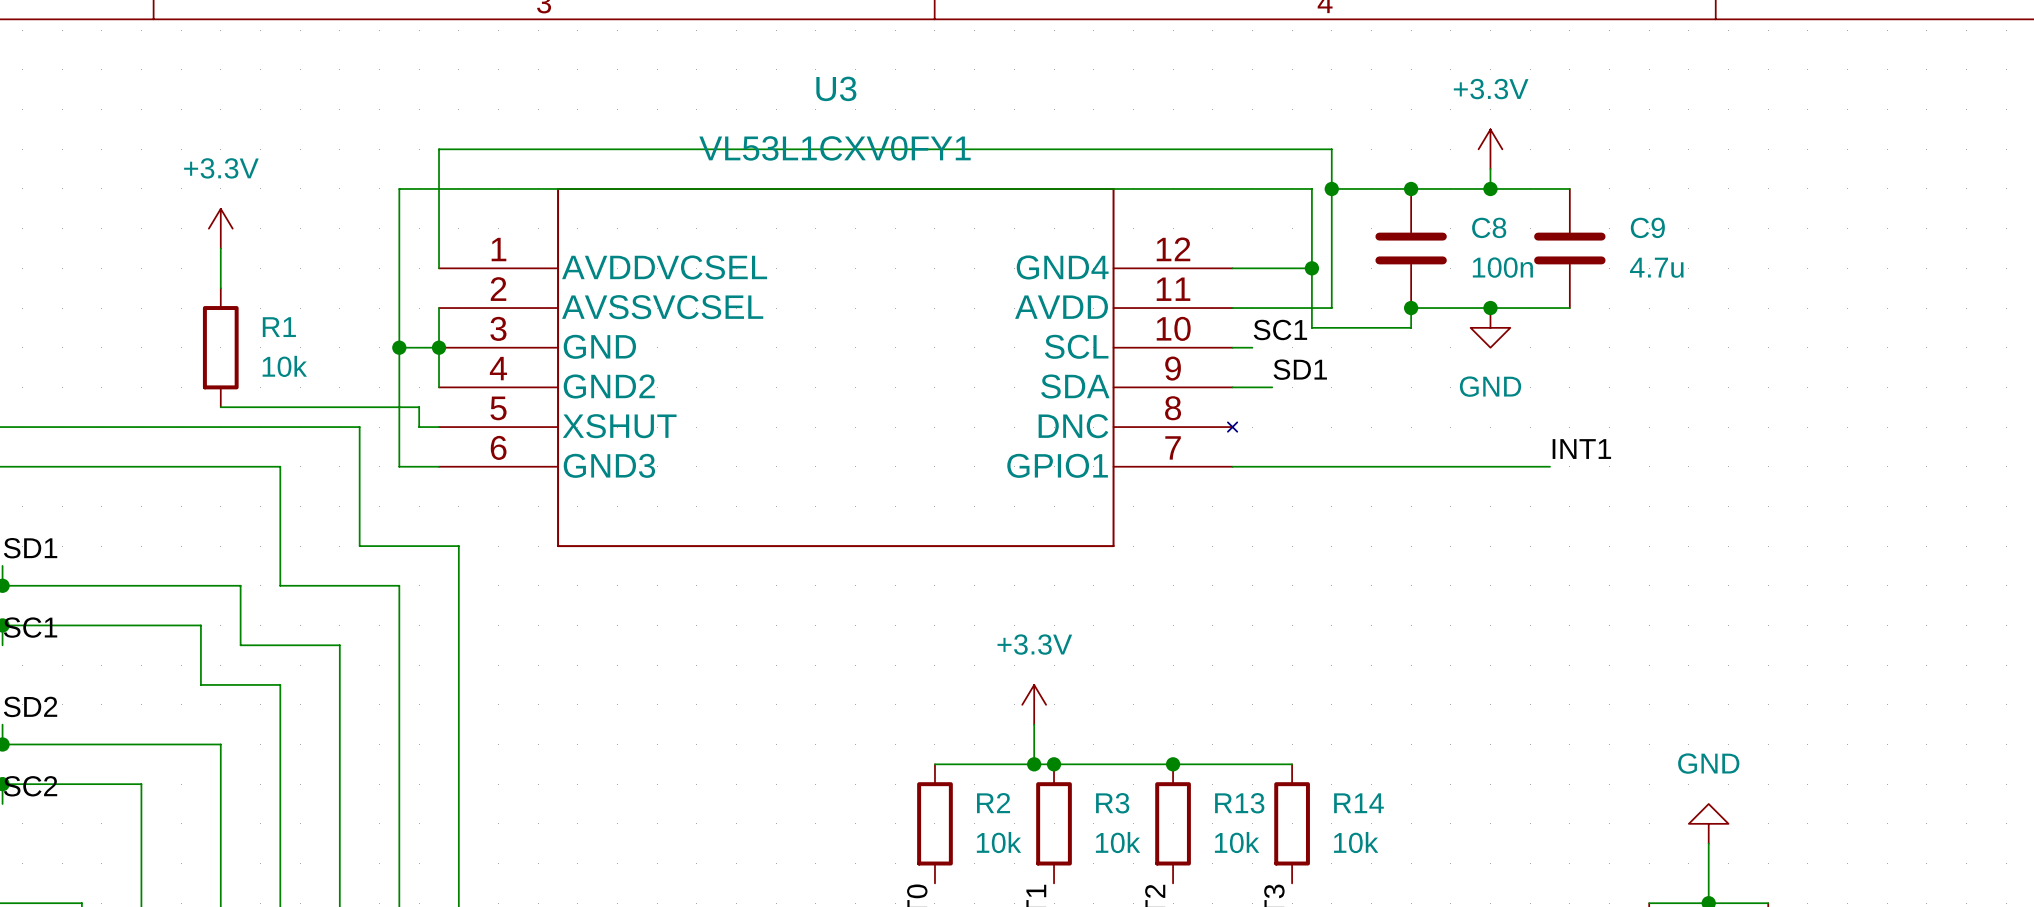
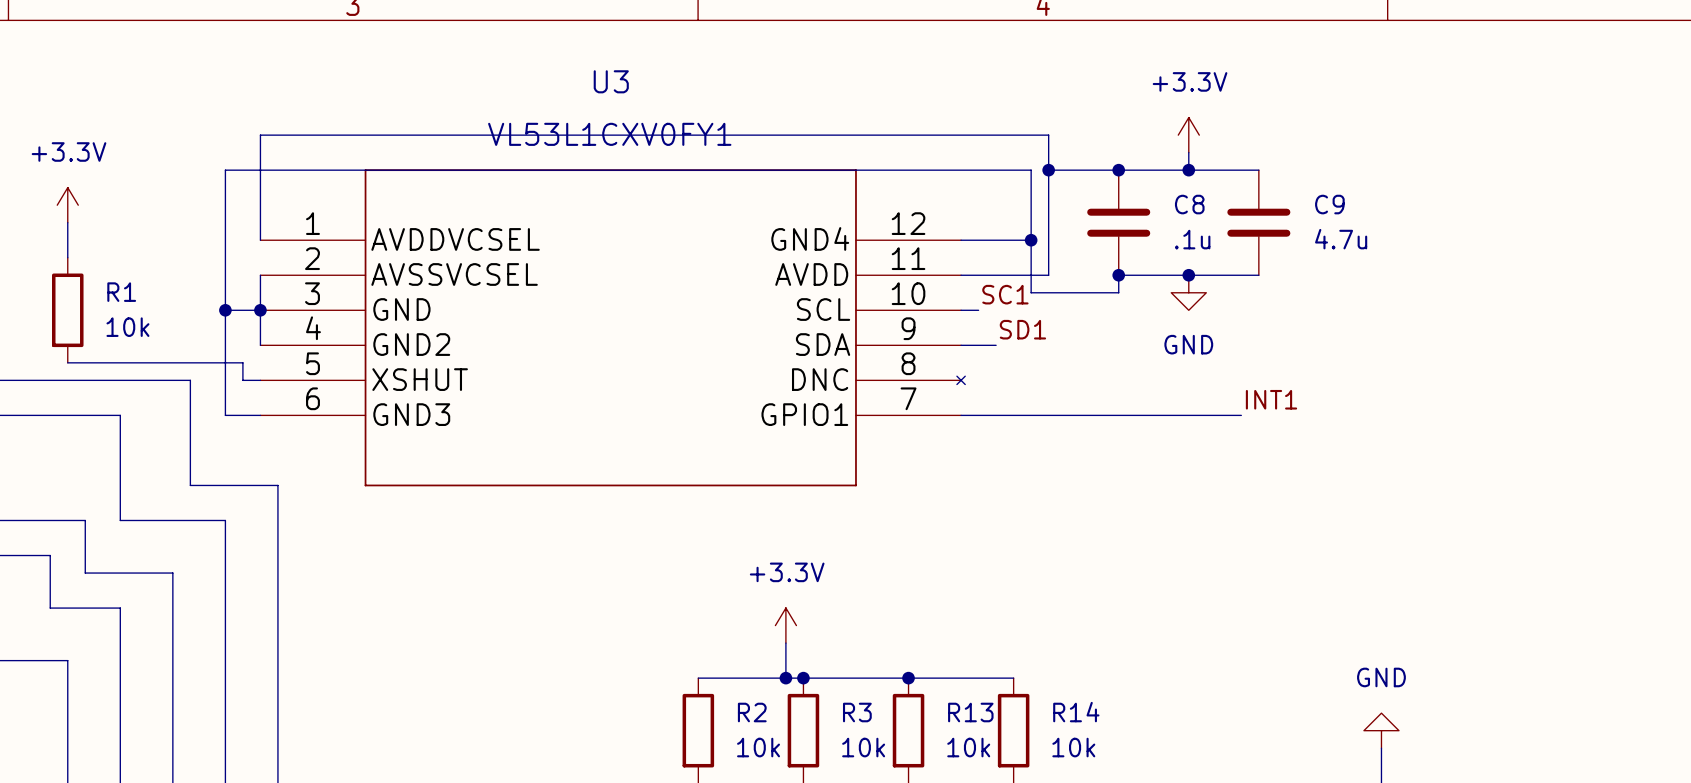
C8 value: 100n (1502, 267) -> .1u (1192, 239)

